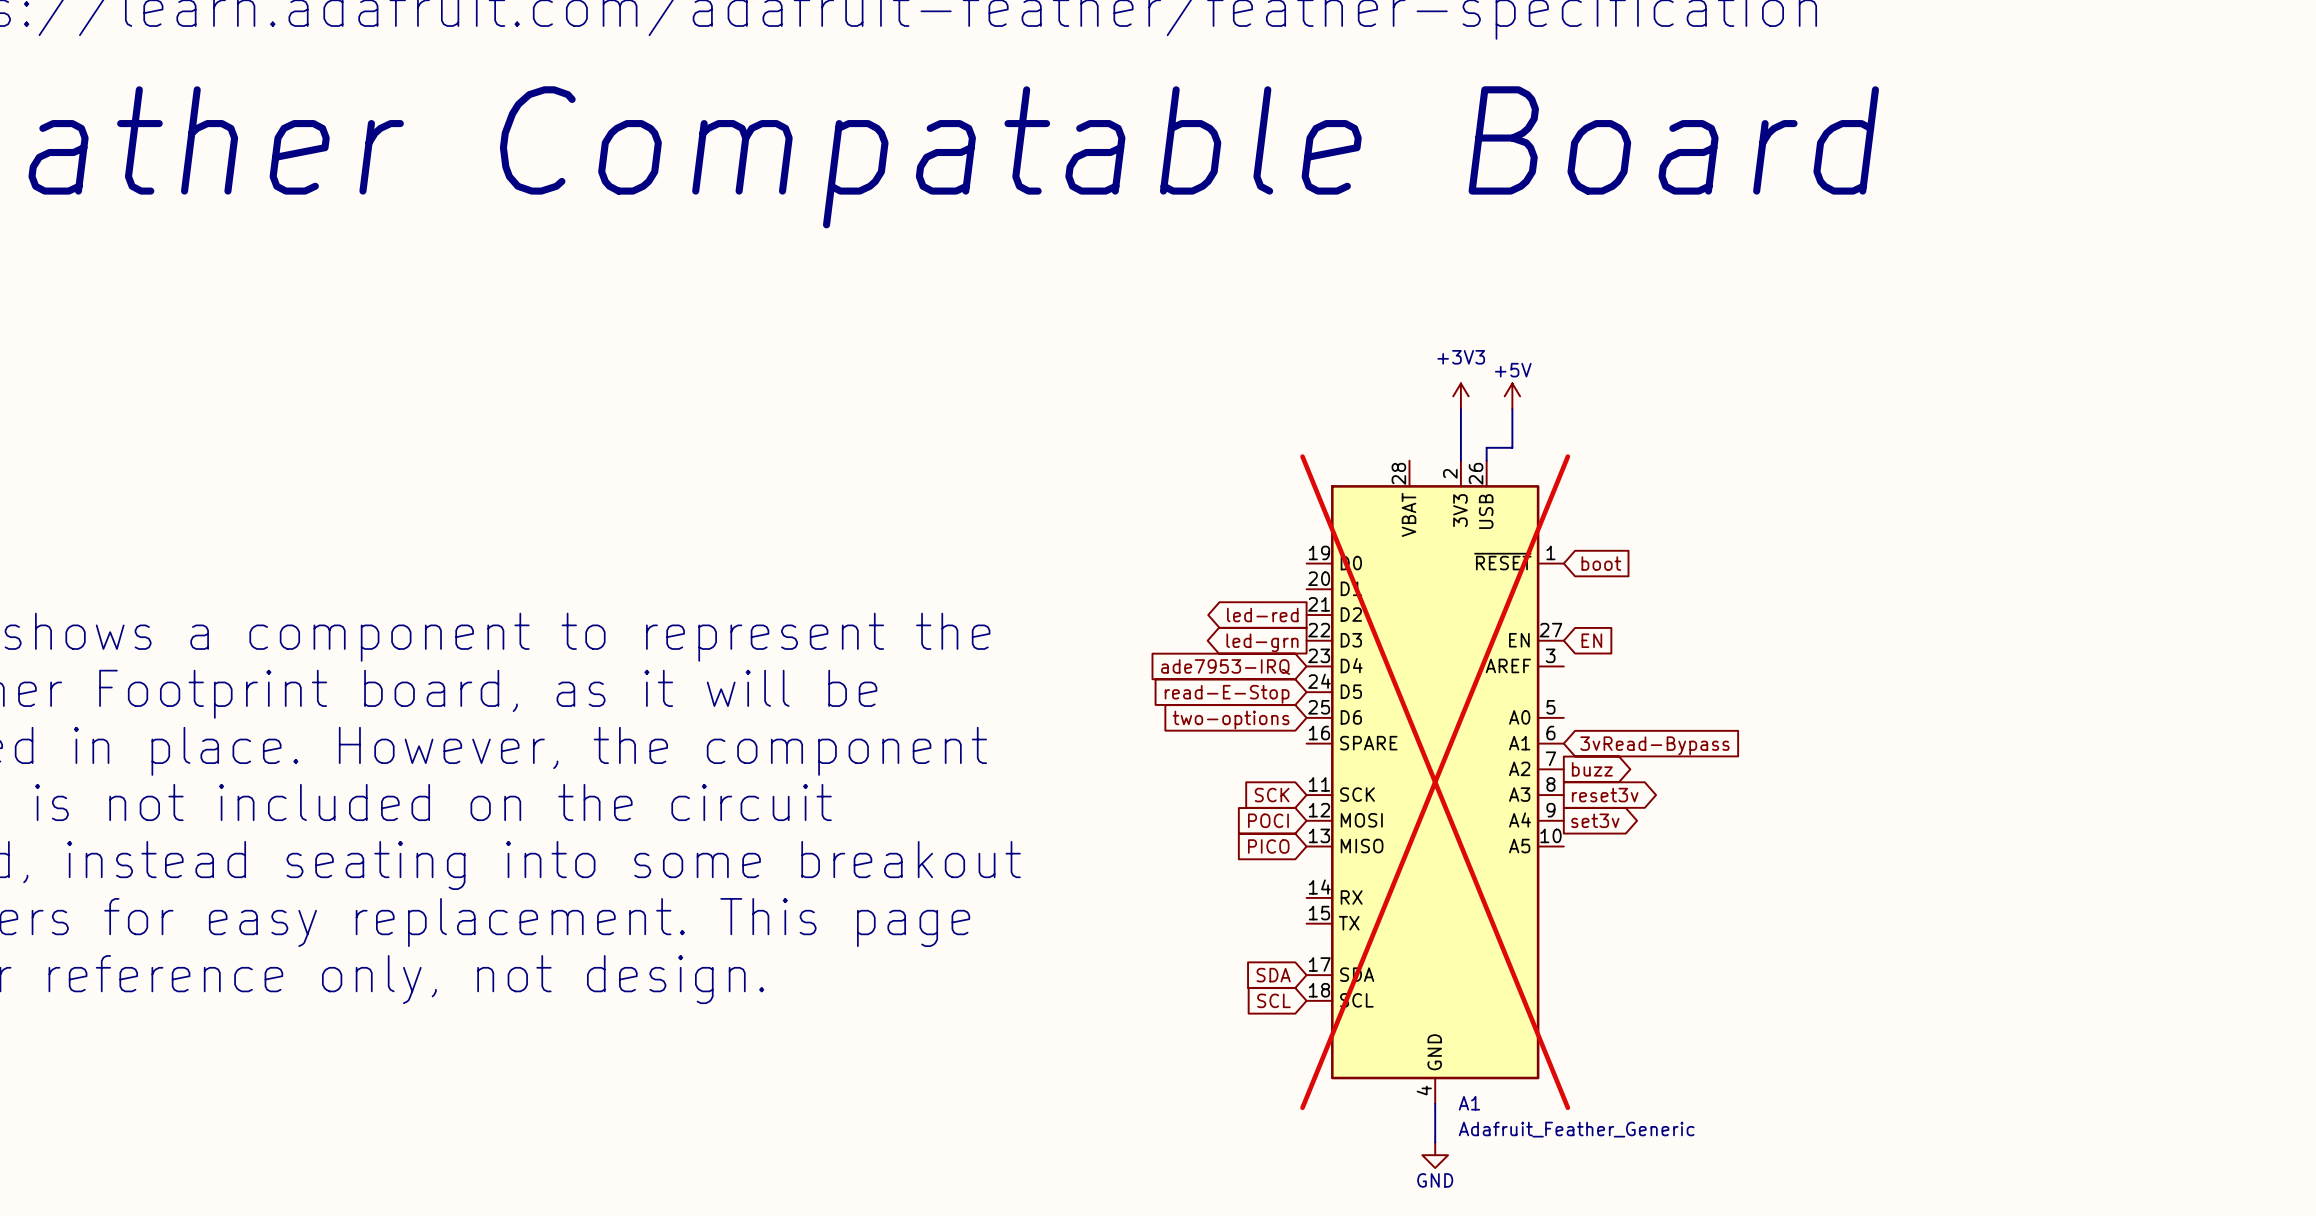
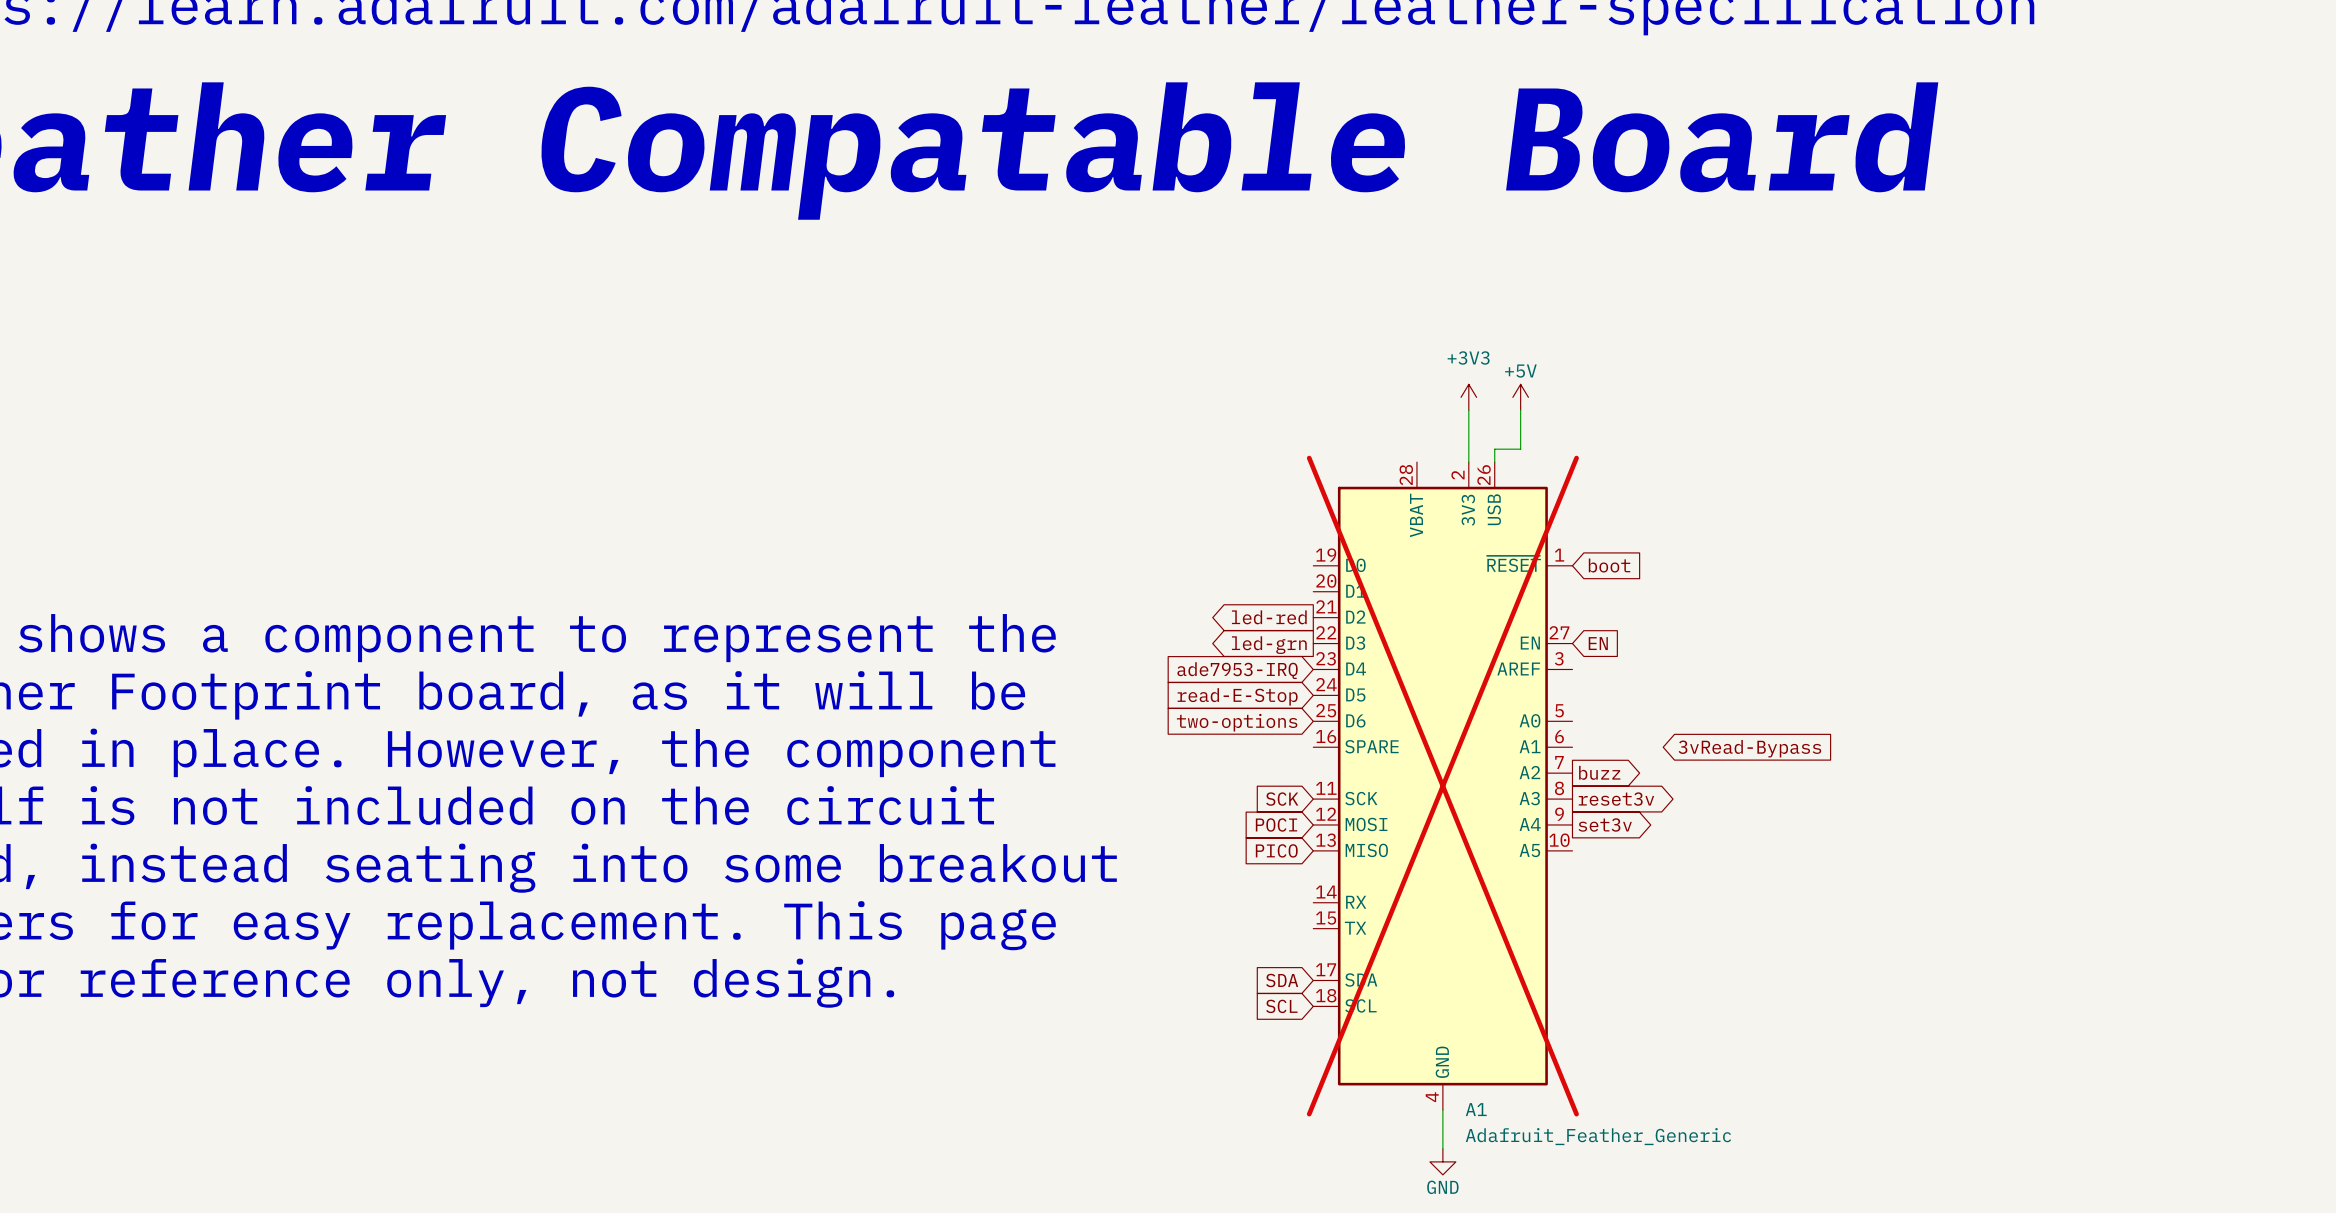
global label position: 3vRead-Bypass (1654, 745) -> 3vRead-Bypass (1749, 748)

